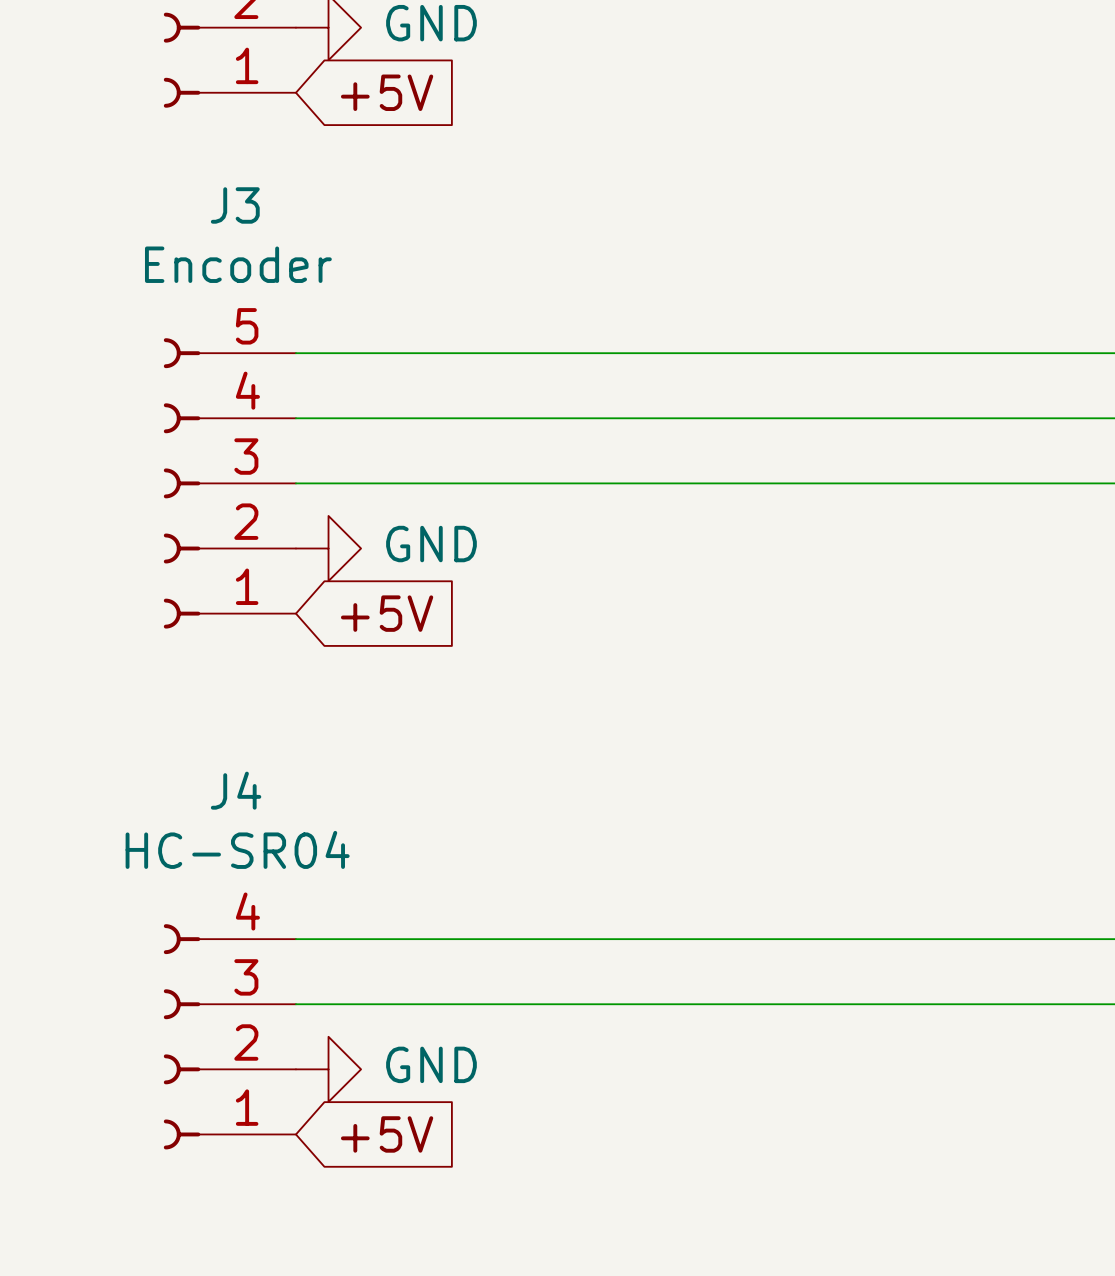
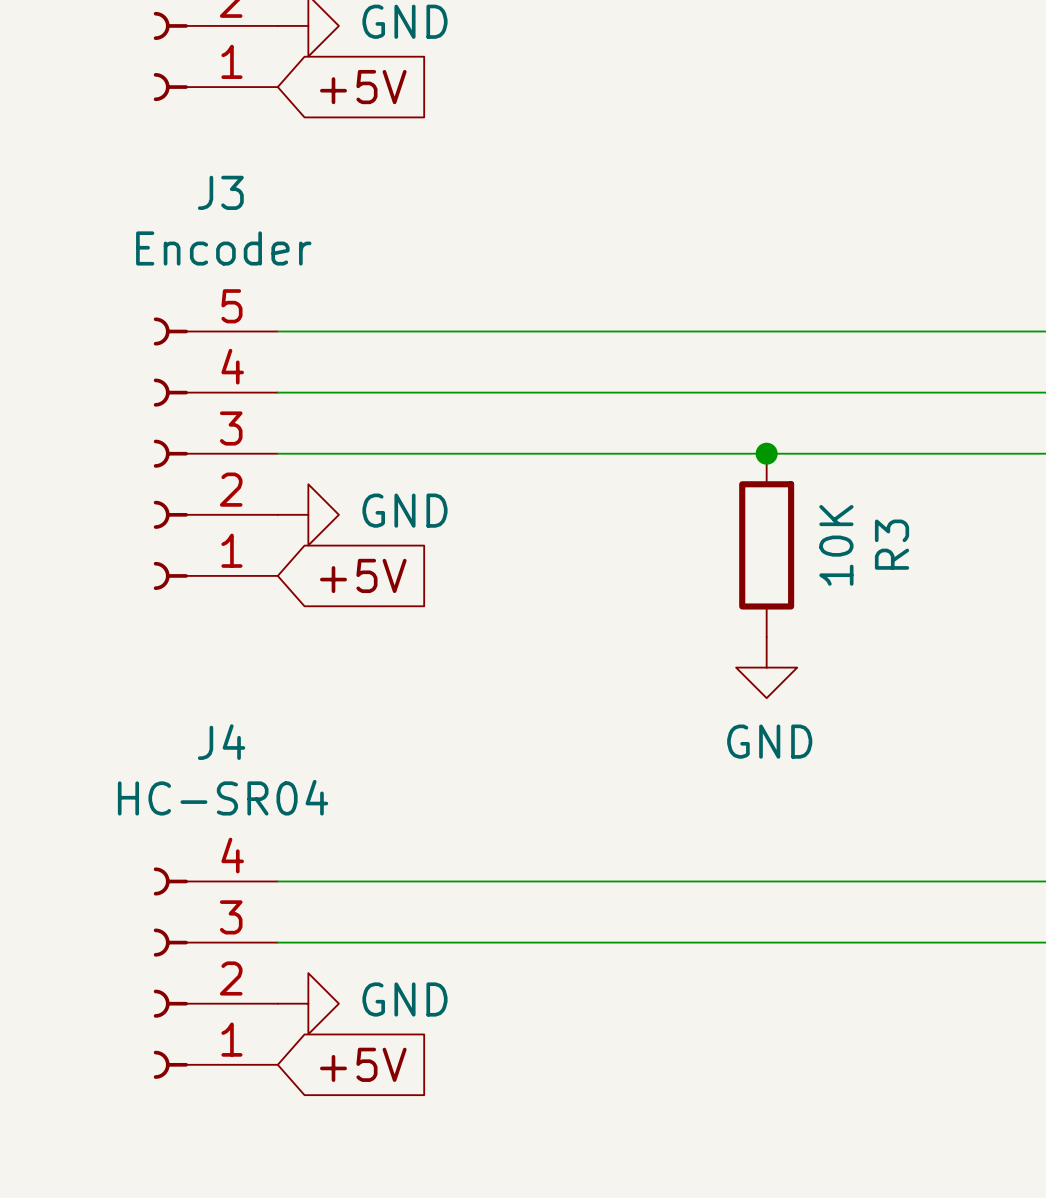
junction: none -> (766, 453)
R3: none -> 10K (766, 545)
power symbol: none -> GND (766, 667)

